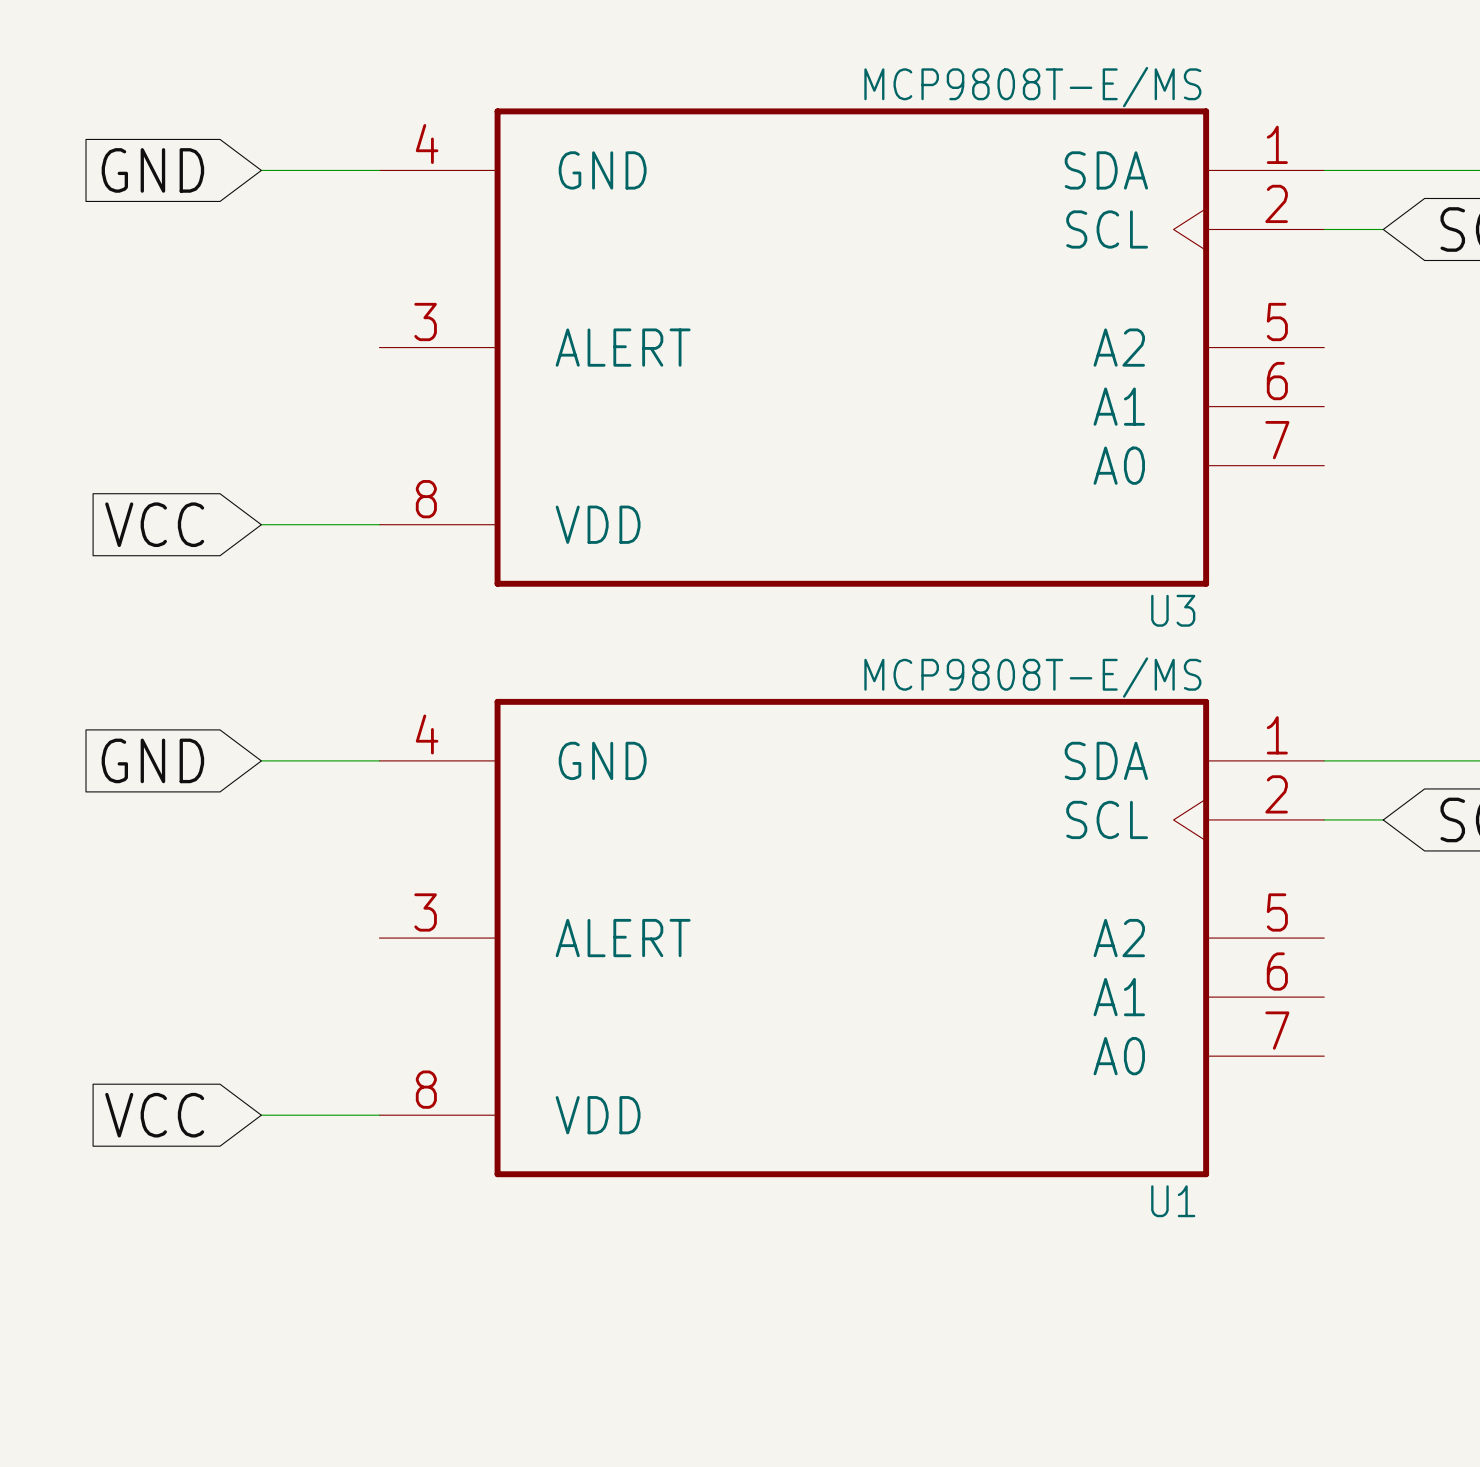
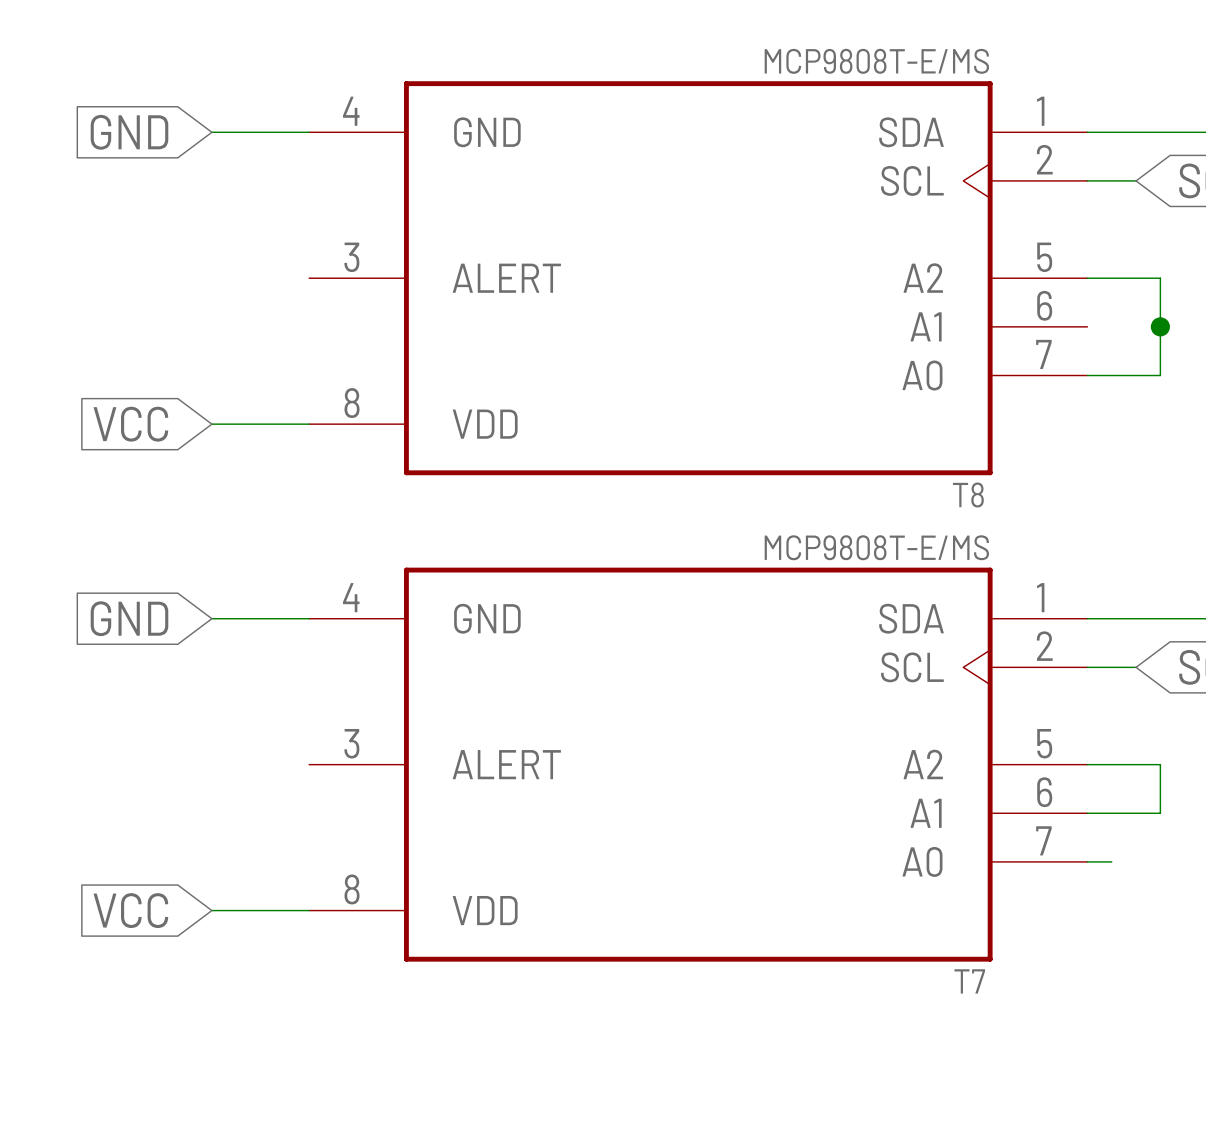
wire: none -> (1087, 278) (1160, 278) (1160, 375) (1087, 375)
junction: none -> (1160, 326)
U3 name: U3 (1173, 610) -> T8 (968, 494)
wire: none -> (1087, 764) (1160, 764) (1160, 813) (1087, 813)
wire: none -> (1087, 861) (1111, 861)
U1 name: U1 (1173, 1201) -> T7 (969, 981)

